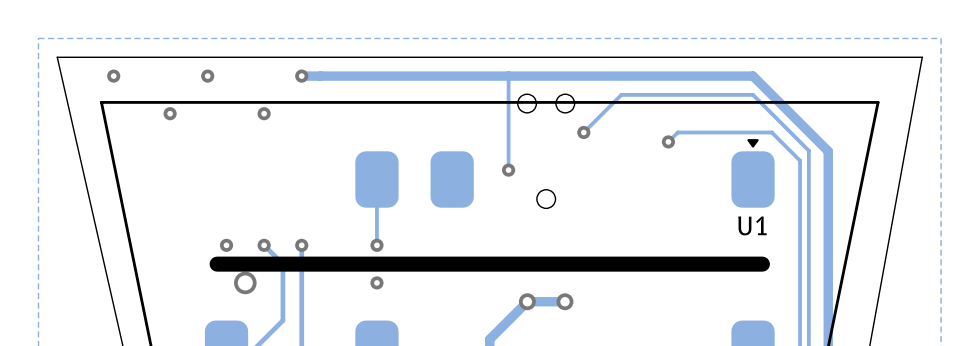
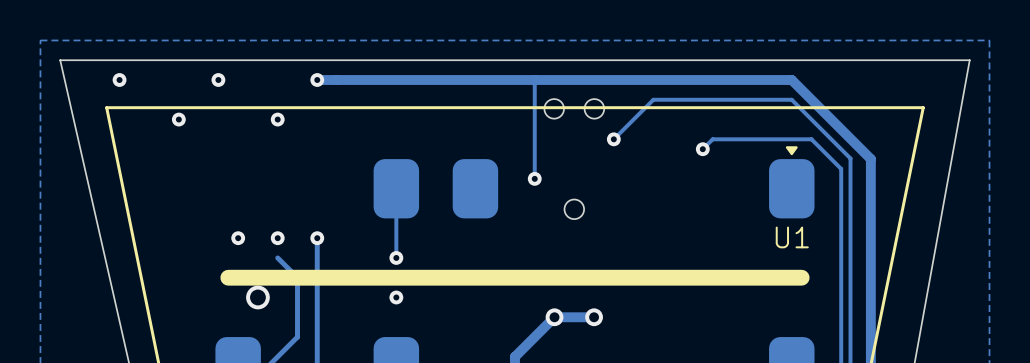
track: none -> (317, 238) (317, 257)
via position: (226, 245) -> (238, 238)
via position: (264, 245) -> (277, 238)
via position: (301, 245) -> (317, 238)

